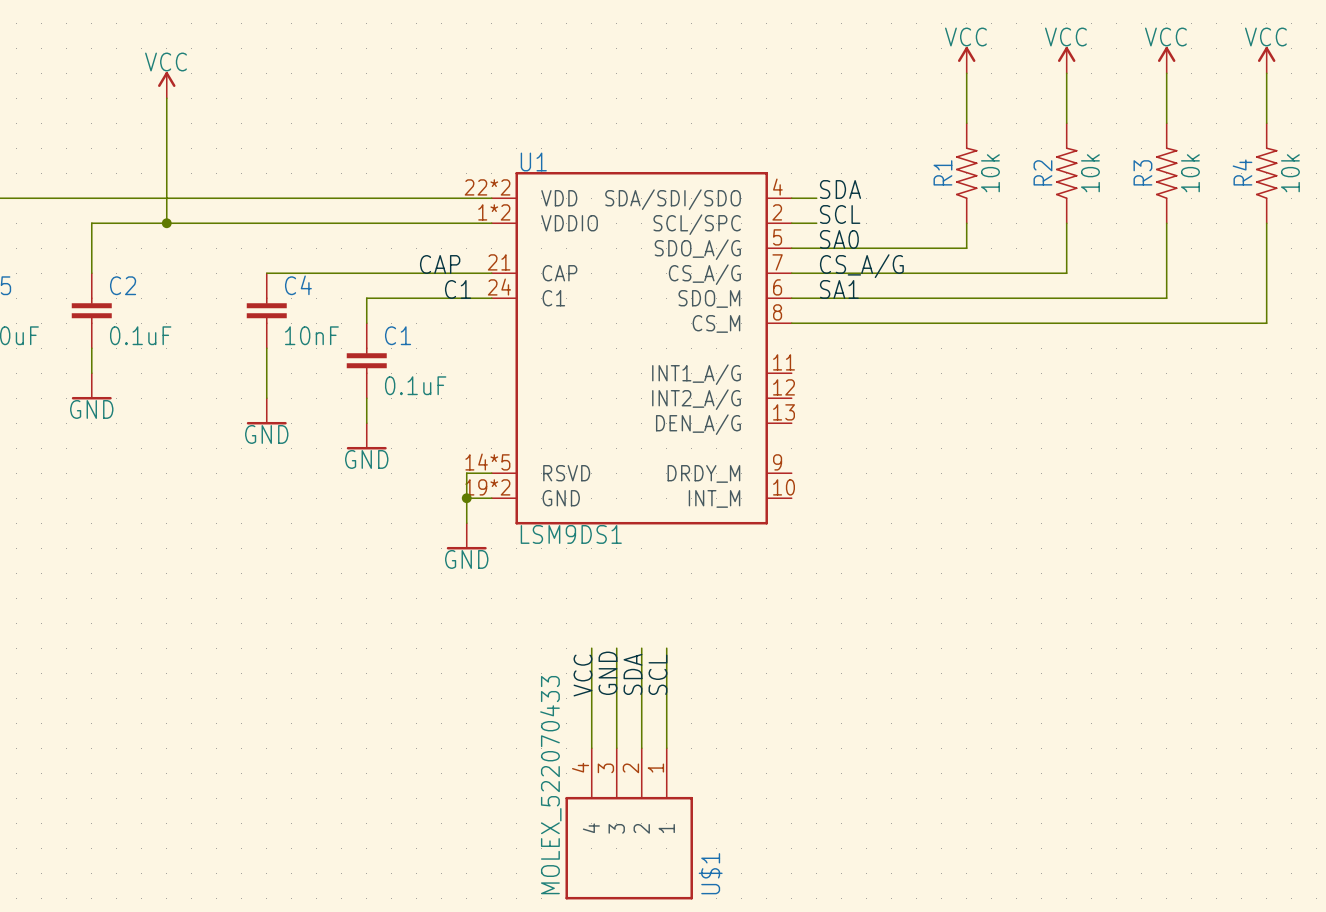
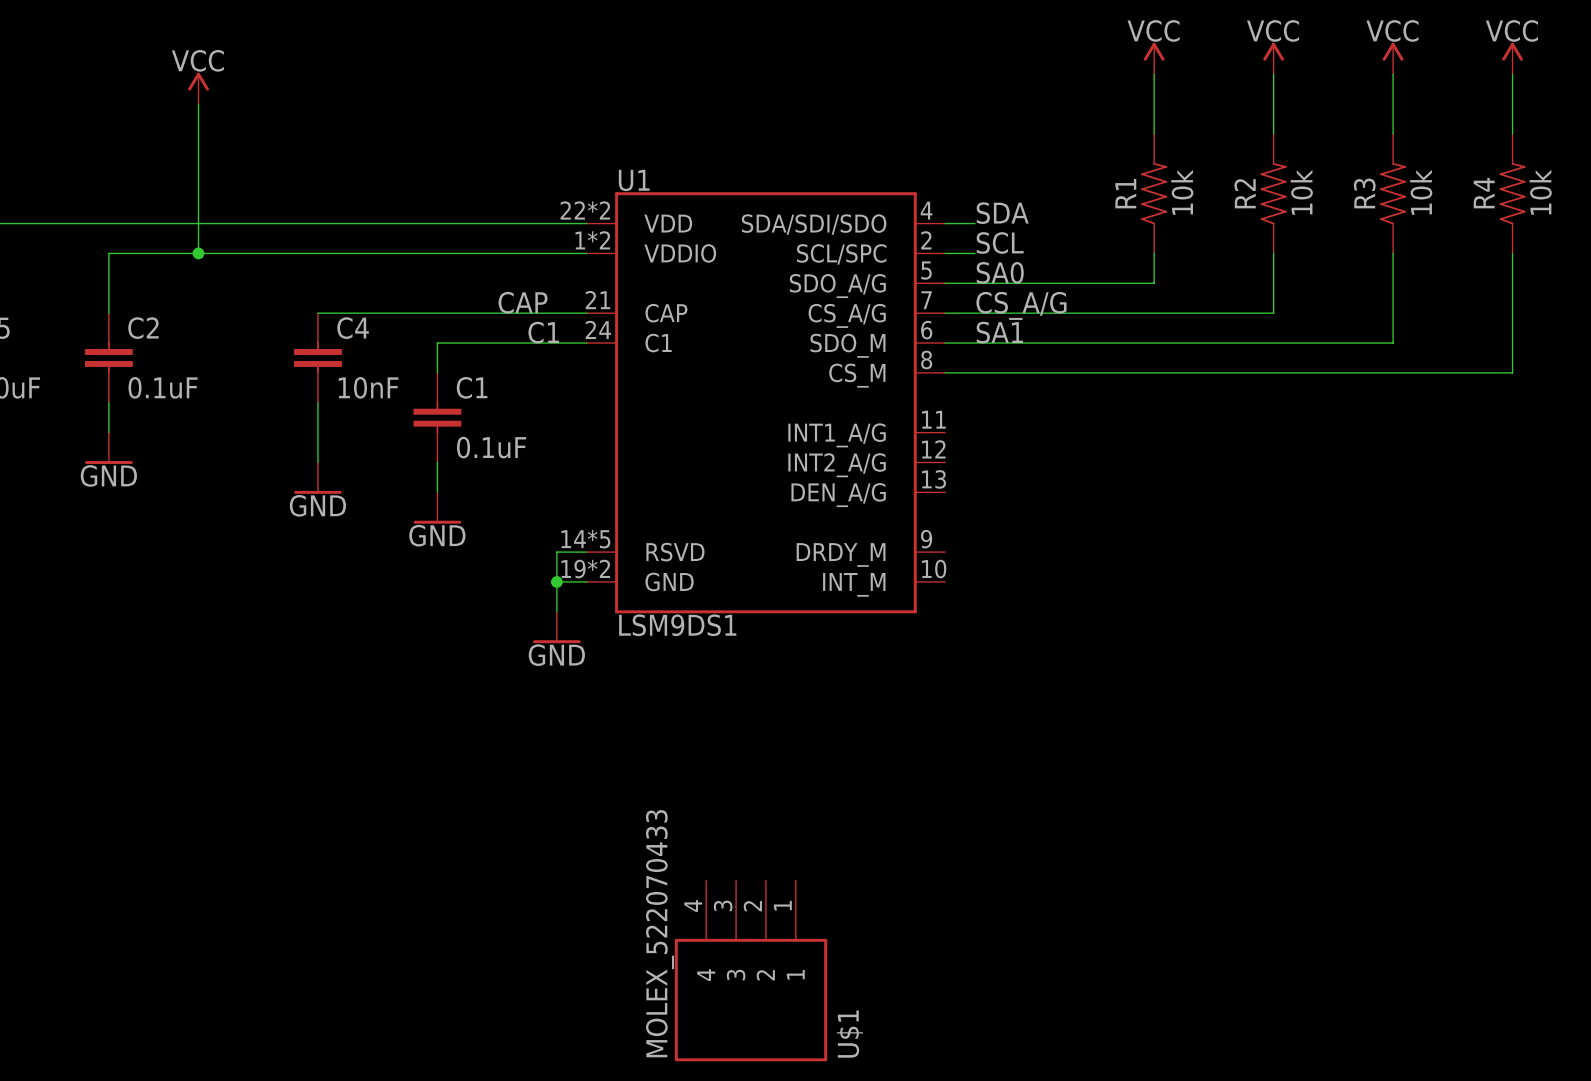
wire: (591, 648) (591, 748) -> none
wire: (616, 648) (616, 748) -> none
wire: (641, 648) (641, 748) -> none
wire: (666, 648) (666, 748) -> none
label: GND (607, 673) -> none
label: SDA (632, 674) -> none
label: SCL (657, 674) -> none
label: VCC (582, 675) -> none

